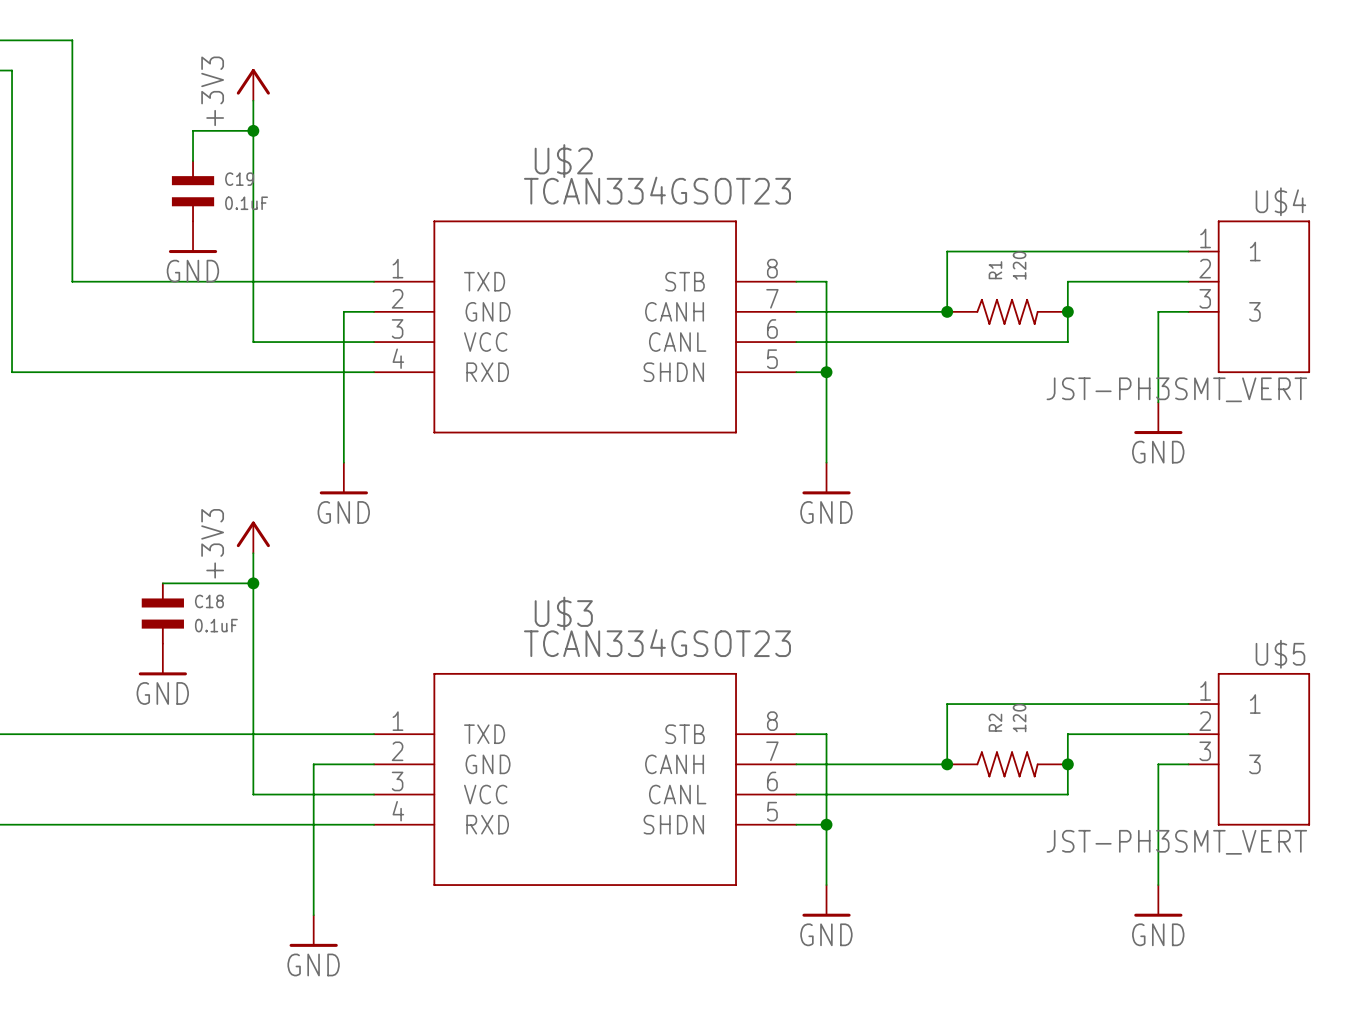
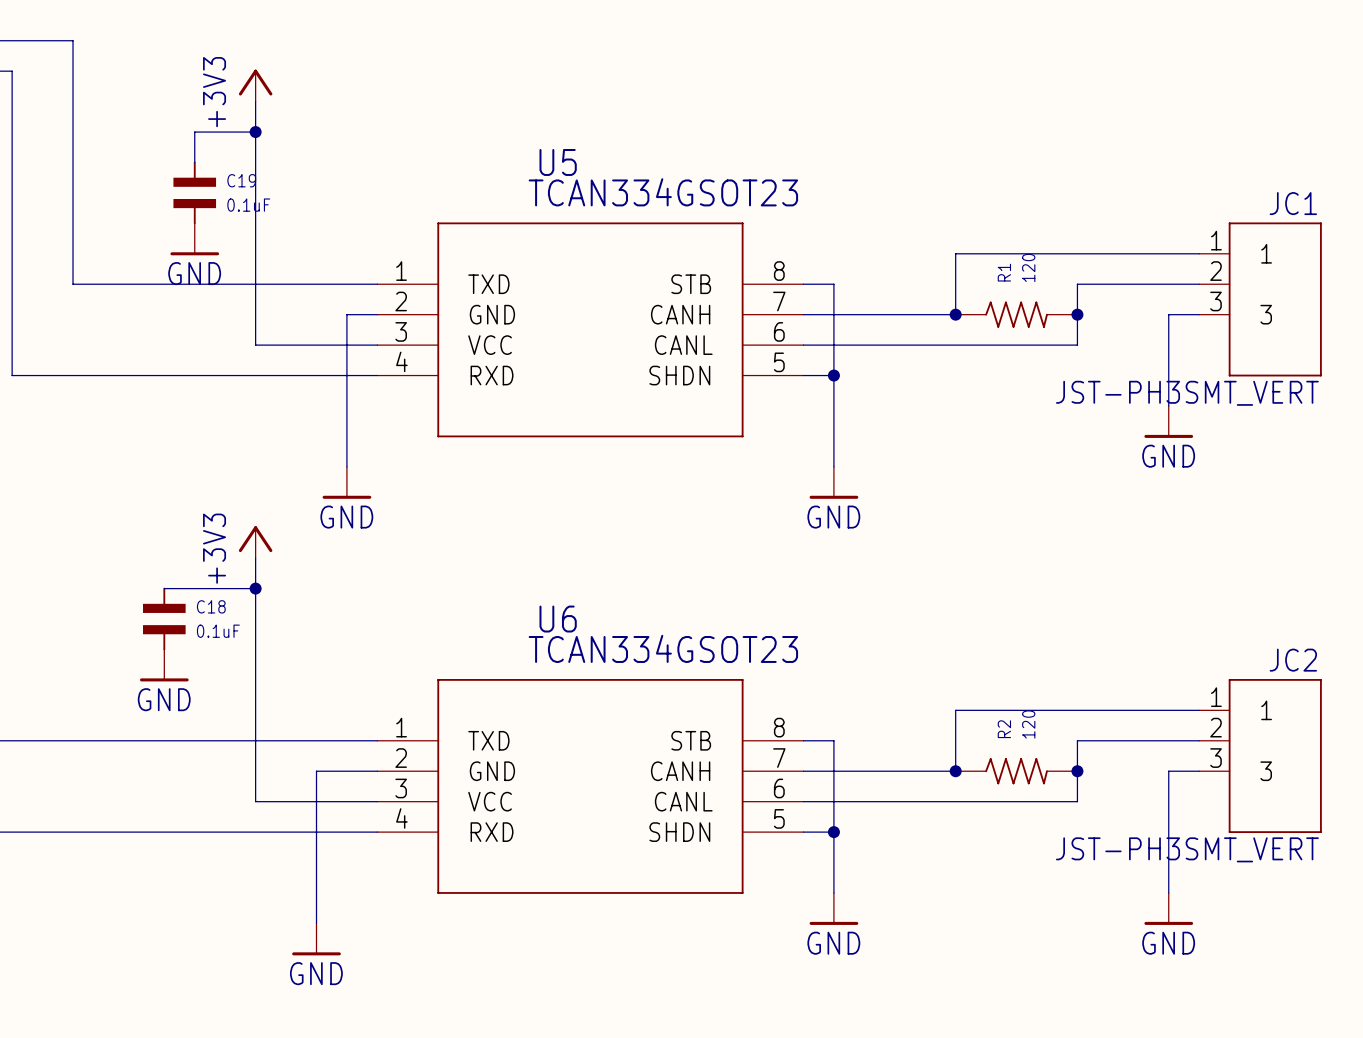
U$2 name: U$2 (563, 161) -> U5 (558, 162)
U$4 name: U$4 (1280, 201) -> JC1 (1293, 203)
U$3 name: U$3 (563, 613) -> U6 (558, 619)
U$5 name: U$5 (1280, 654) -> JC2 (1293, 660)

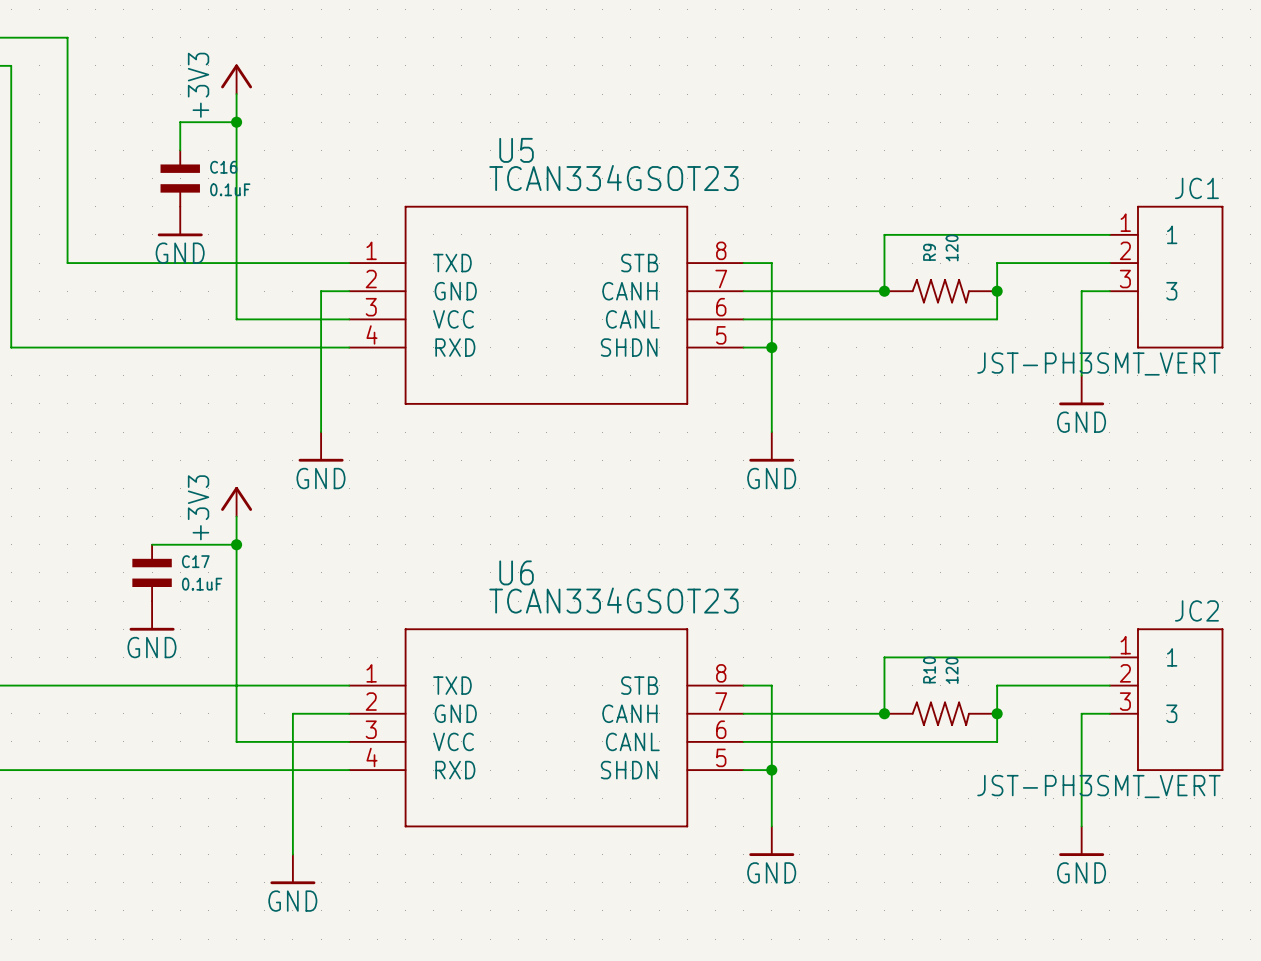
C19 name: C19 (241, 180) -> C16 (223, 167)
R1 name: R1 (1004, 272) -> R9 (929, 252)
C18 name: C18 (211, 606) -> C17 (195, 561)
R2 name: R2 (1004, 729) -> R10 (929, 670)

